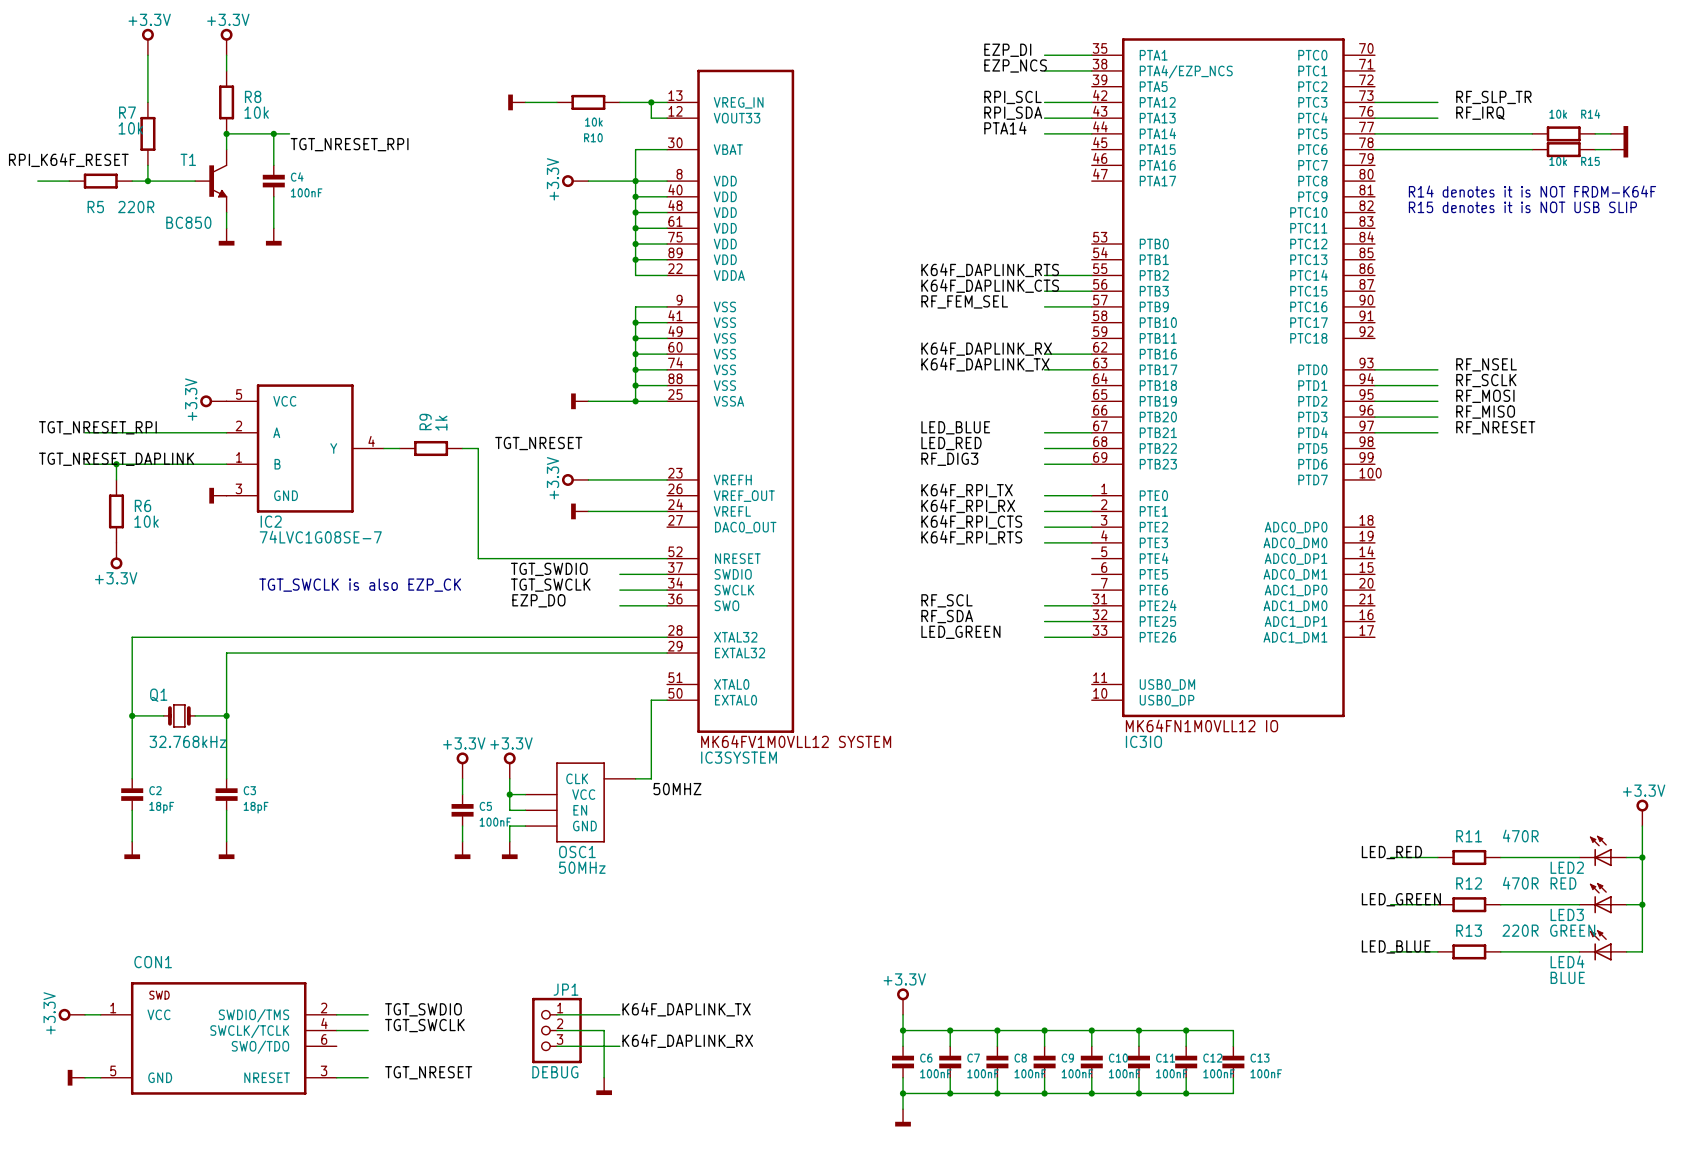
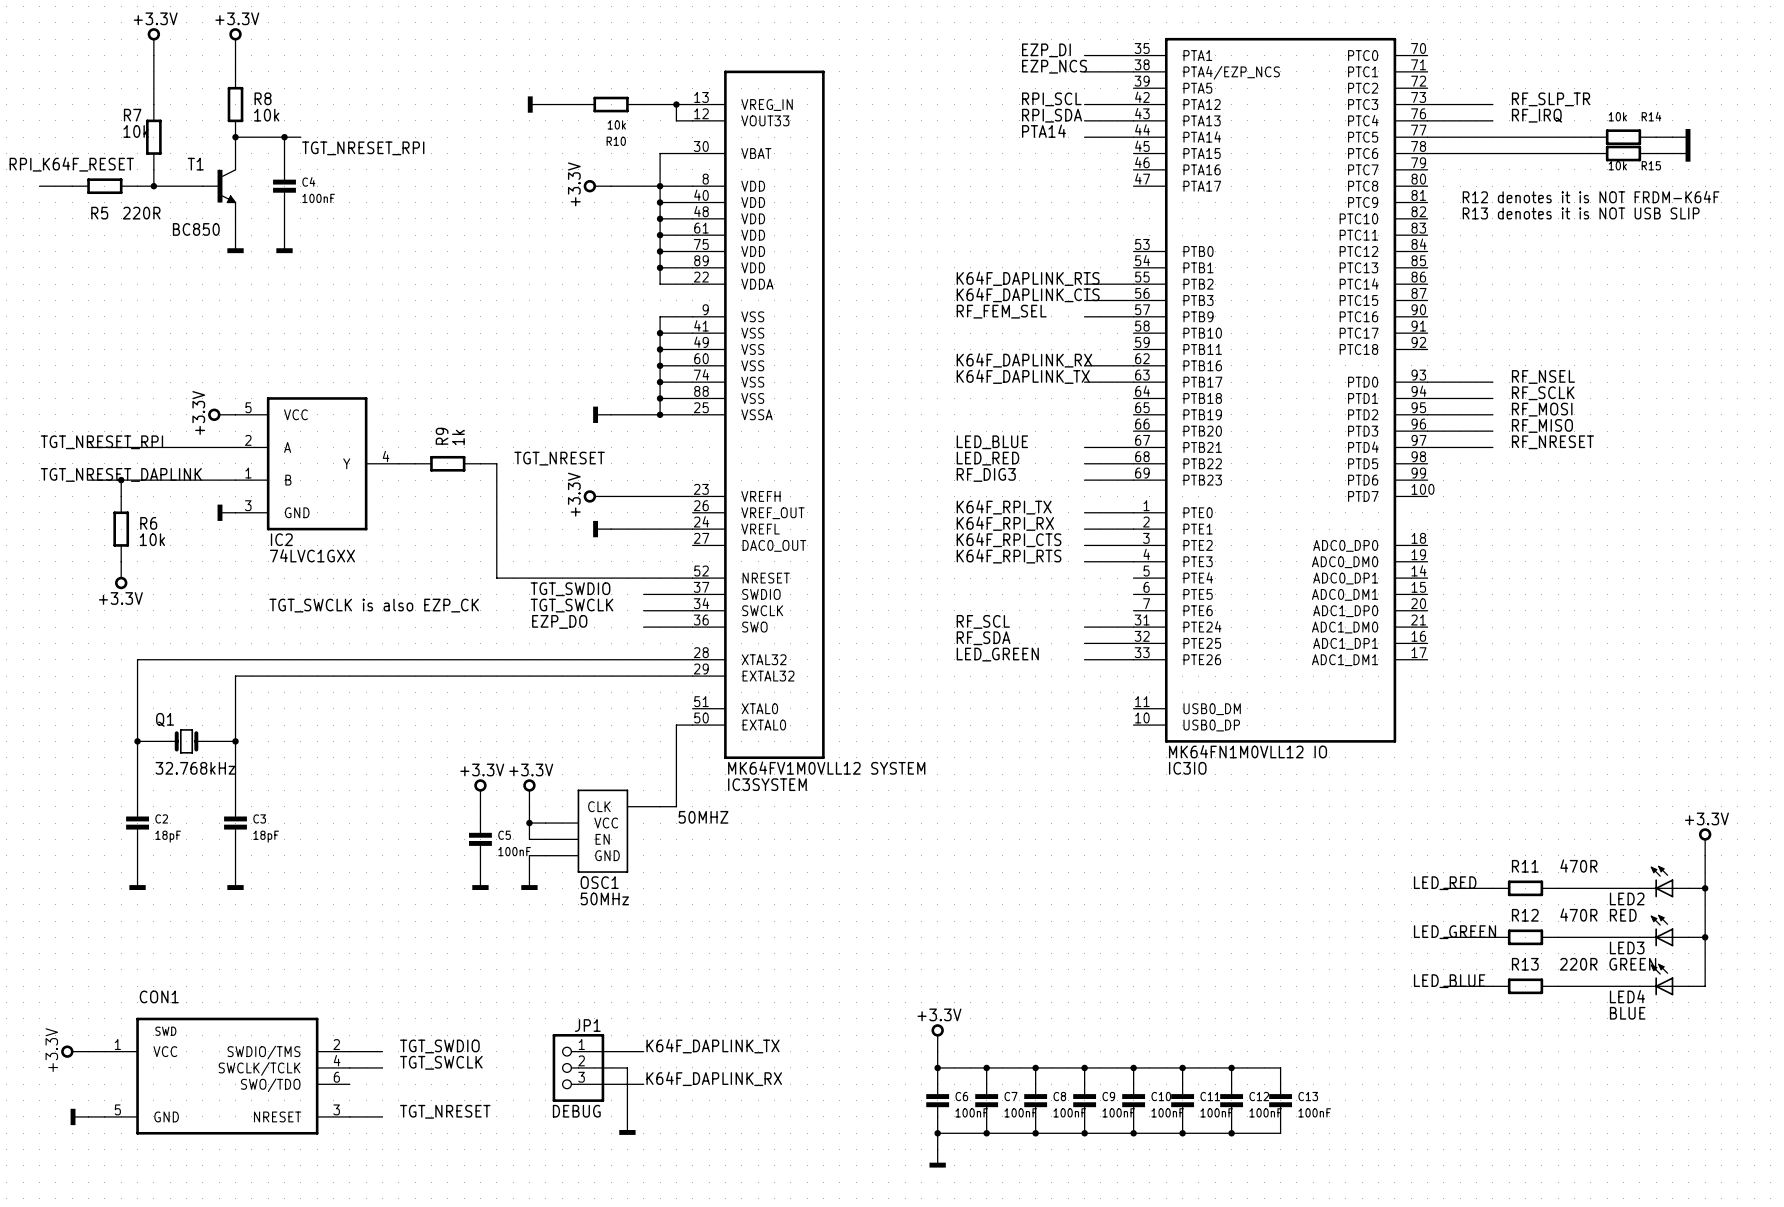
text: R14 denotes it is NOT FRDM-K64F (1532, 191) -> R12 denotes it is NOT FRDM-K64F (1591, 197)
text: R15 denotes it is NOT USB SLIP (1522, 207) -> R13 denotes it is NOT USB SLIP (1581, 213)
IC2 value: 74LVC1G08SE-7 (320, 537) -> 74LVC1GXX (312, 555)

